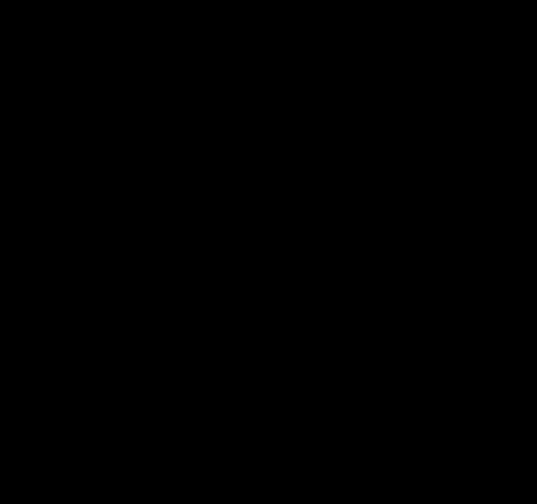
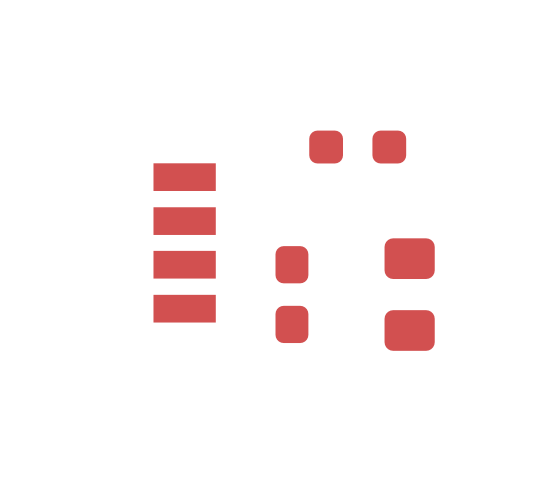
part: none -> (357, 147)
part: none -> (184, 242)
part: none -> (291, 294)
part: none -> (409, 294)

